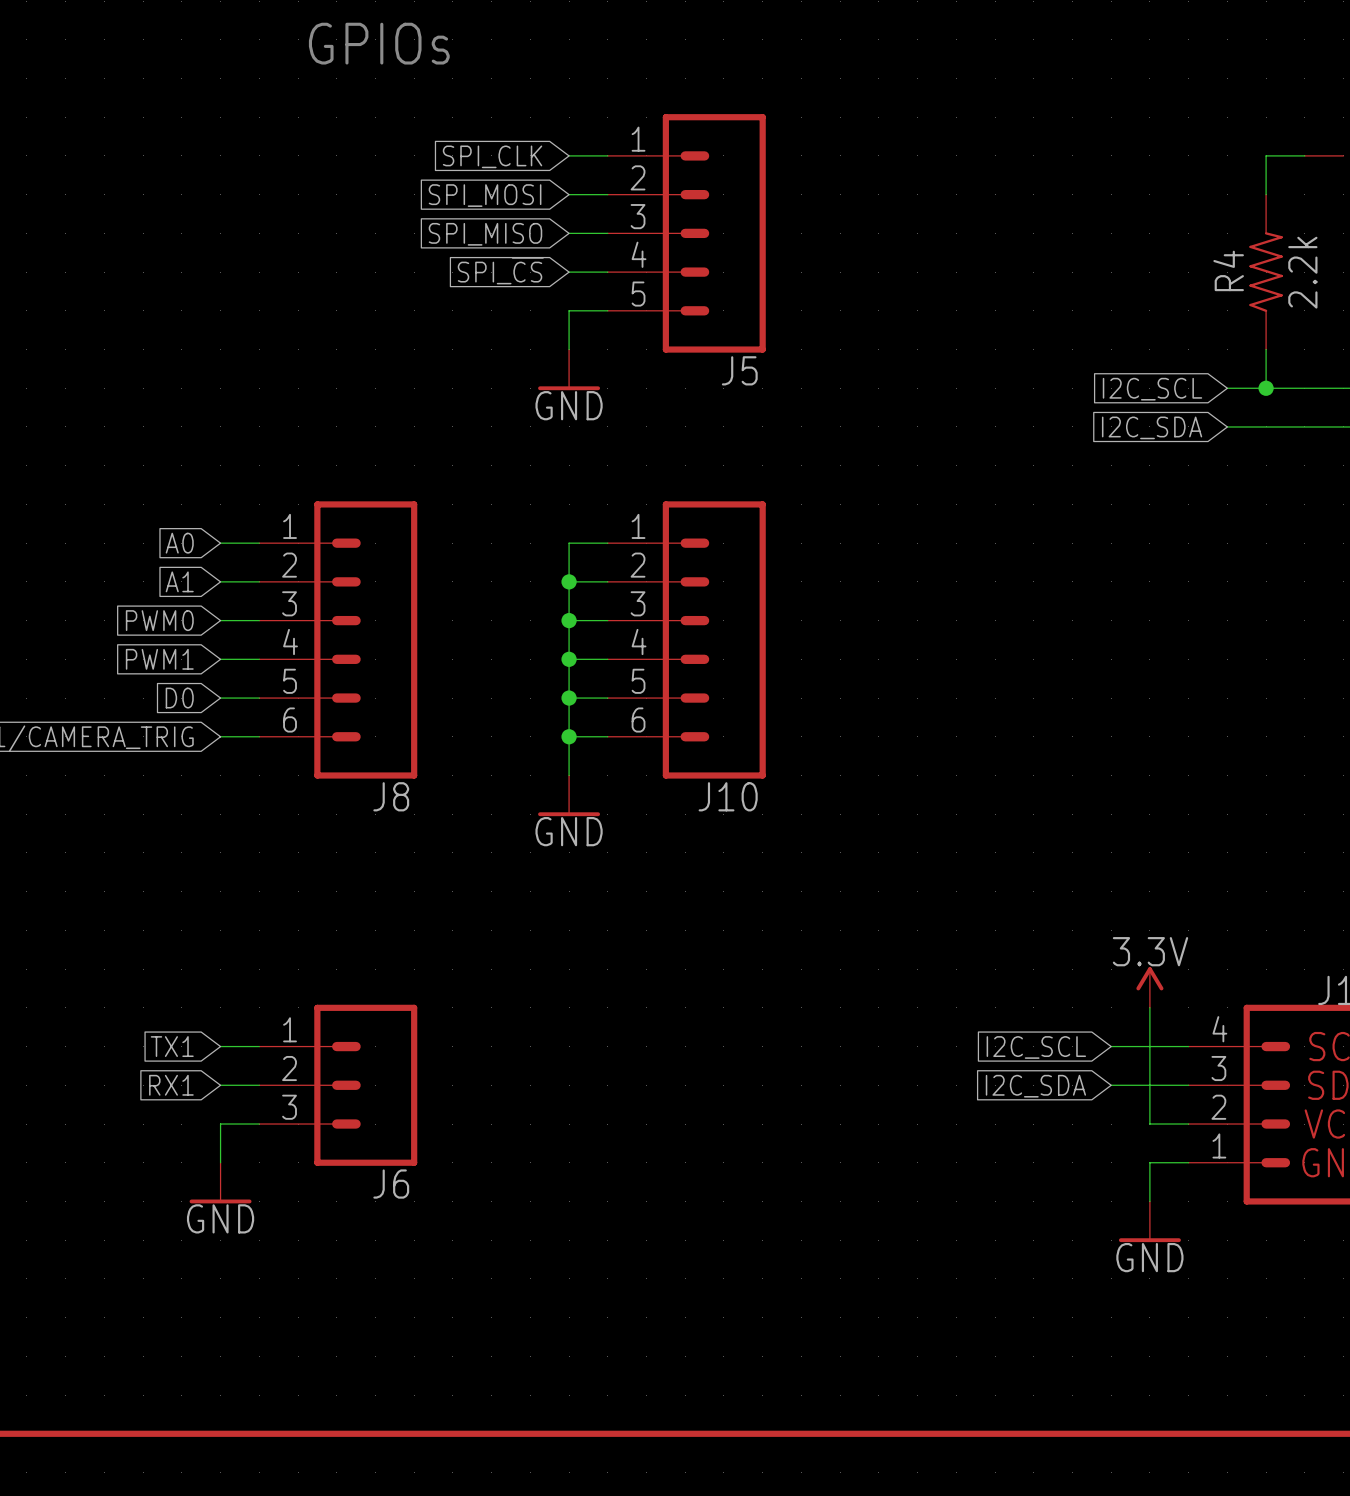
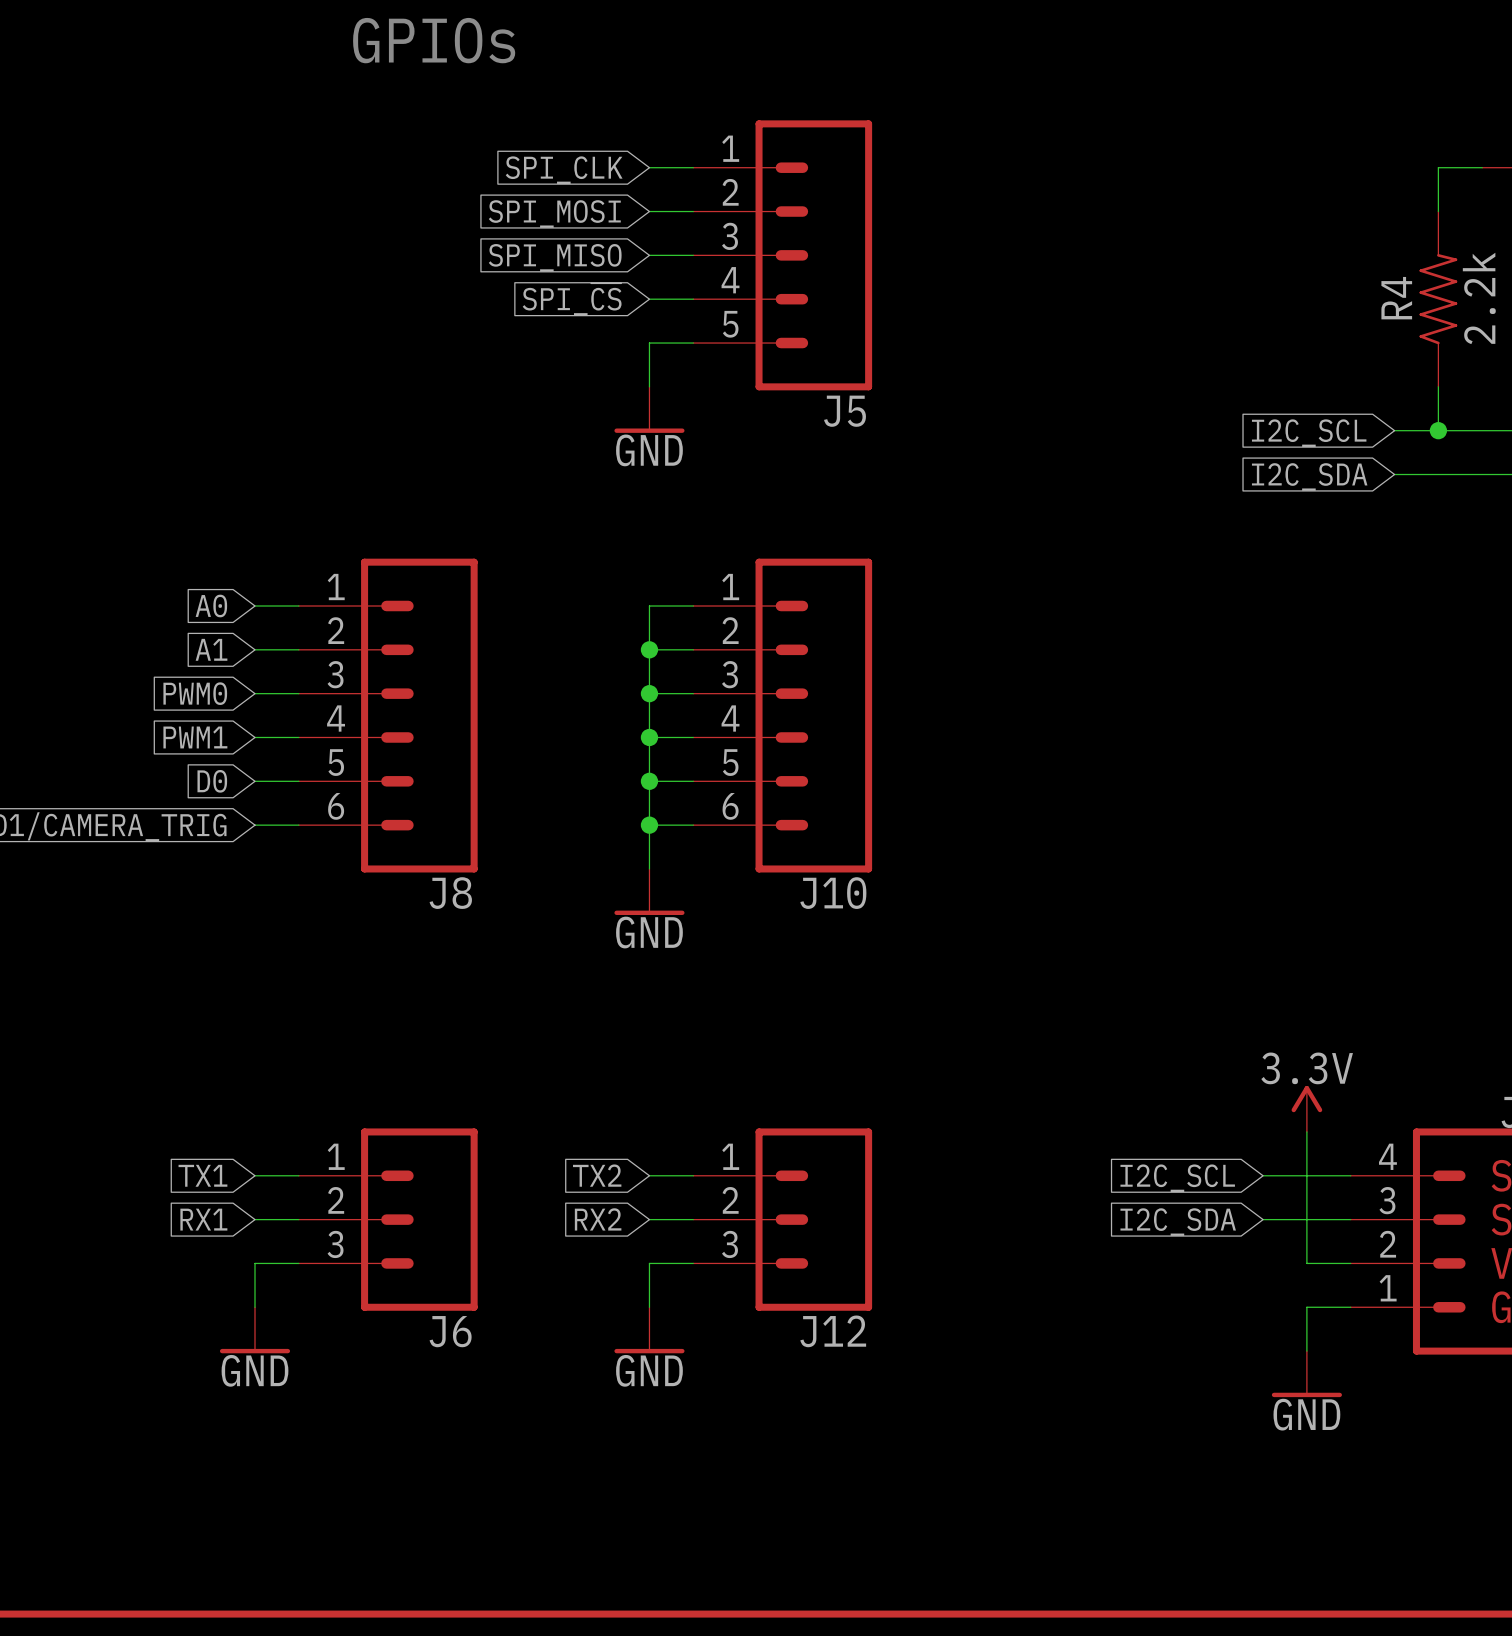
global label: none -> TX2 (597, 1175)
wire: none -> (649, 1175) (693, 1175)
global label: none -> RX2 (598, 1219)
wire: none -> (649, 1219) (693, 1219)
J12: none -> (782, 1219)
wire: none -> (693, 1263) (649, 1263) (649, 1307)
power symbol: none -> GND (649, 1330)

